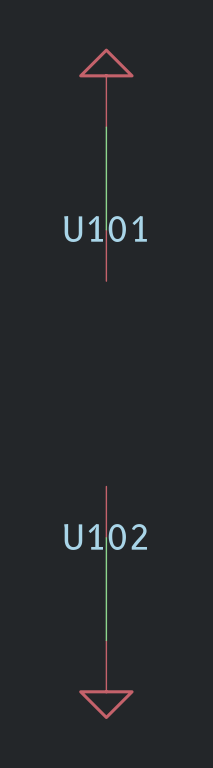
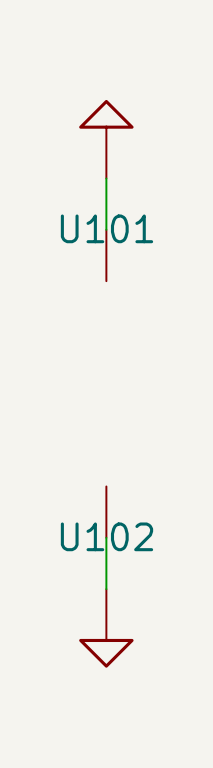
power symbol position: (106, 87) -> (106, 139)
power symbol position: (106, 679) -> (106, 628)

